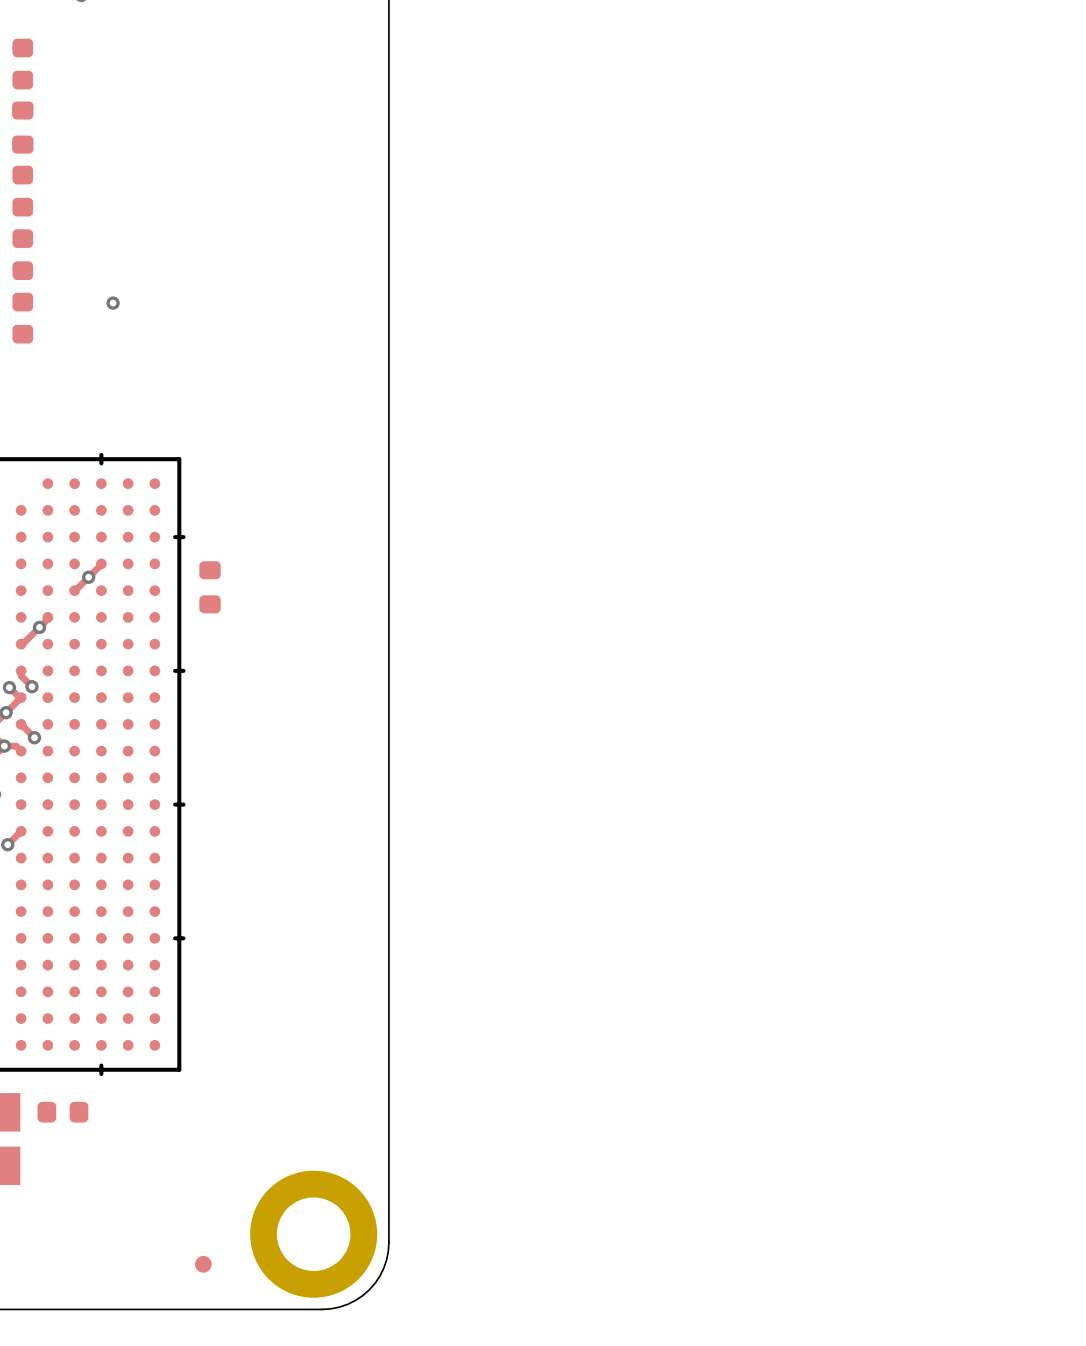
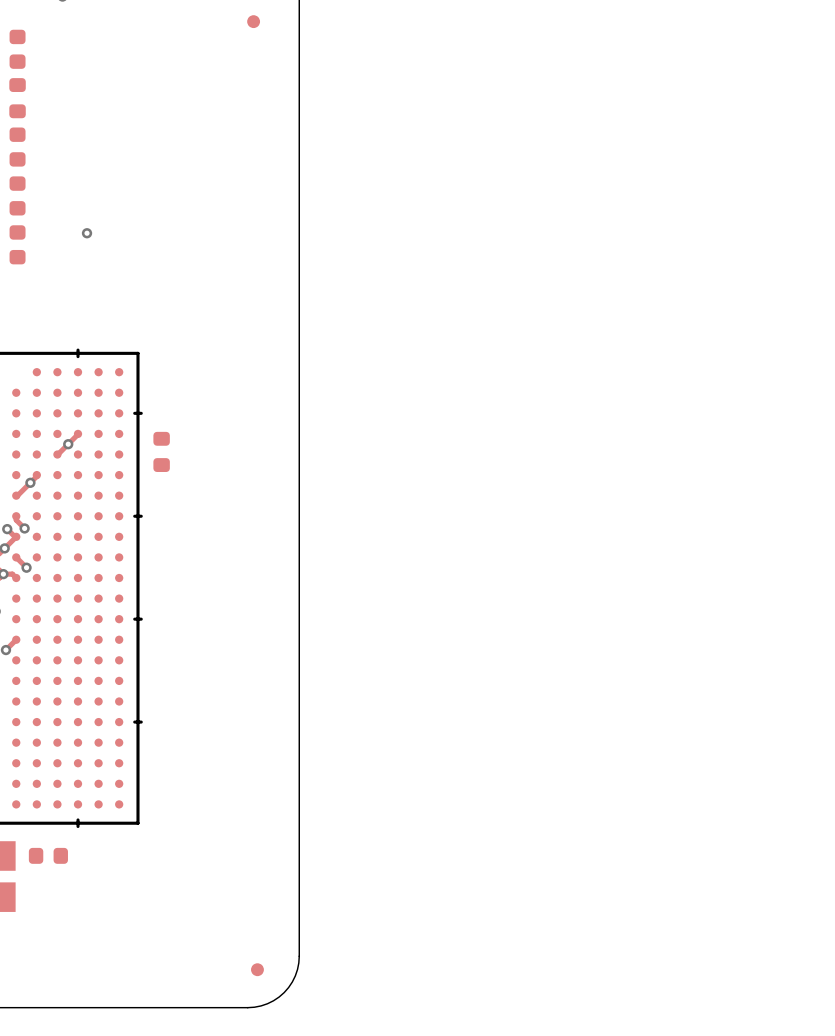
part: none -> (253, 21)
part footprint: [250, 1170, 378, 1298] -> [251, 963, 264, 977]
part: (203, 1264) -> none

